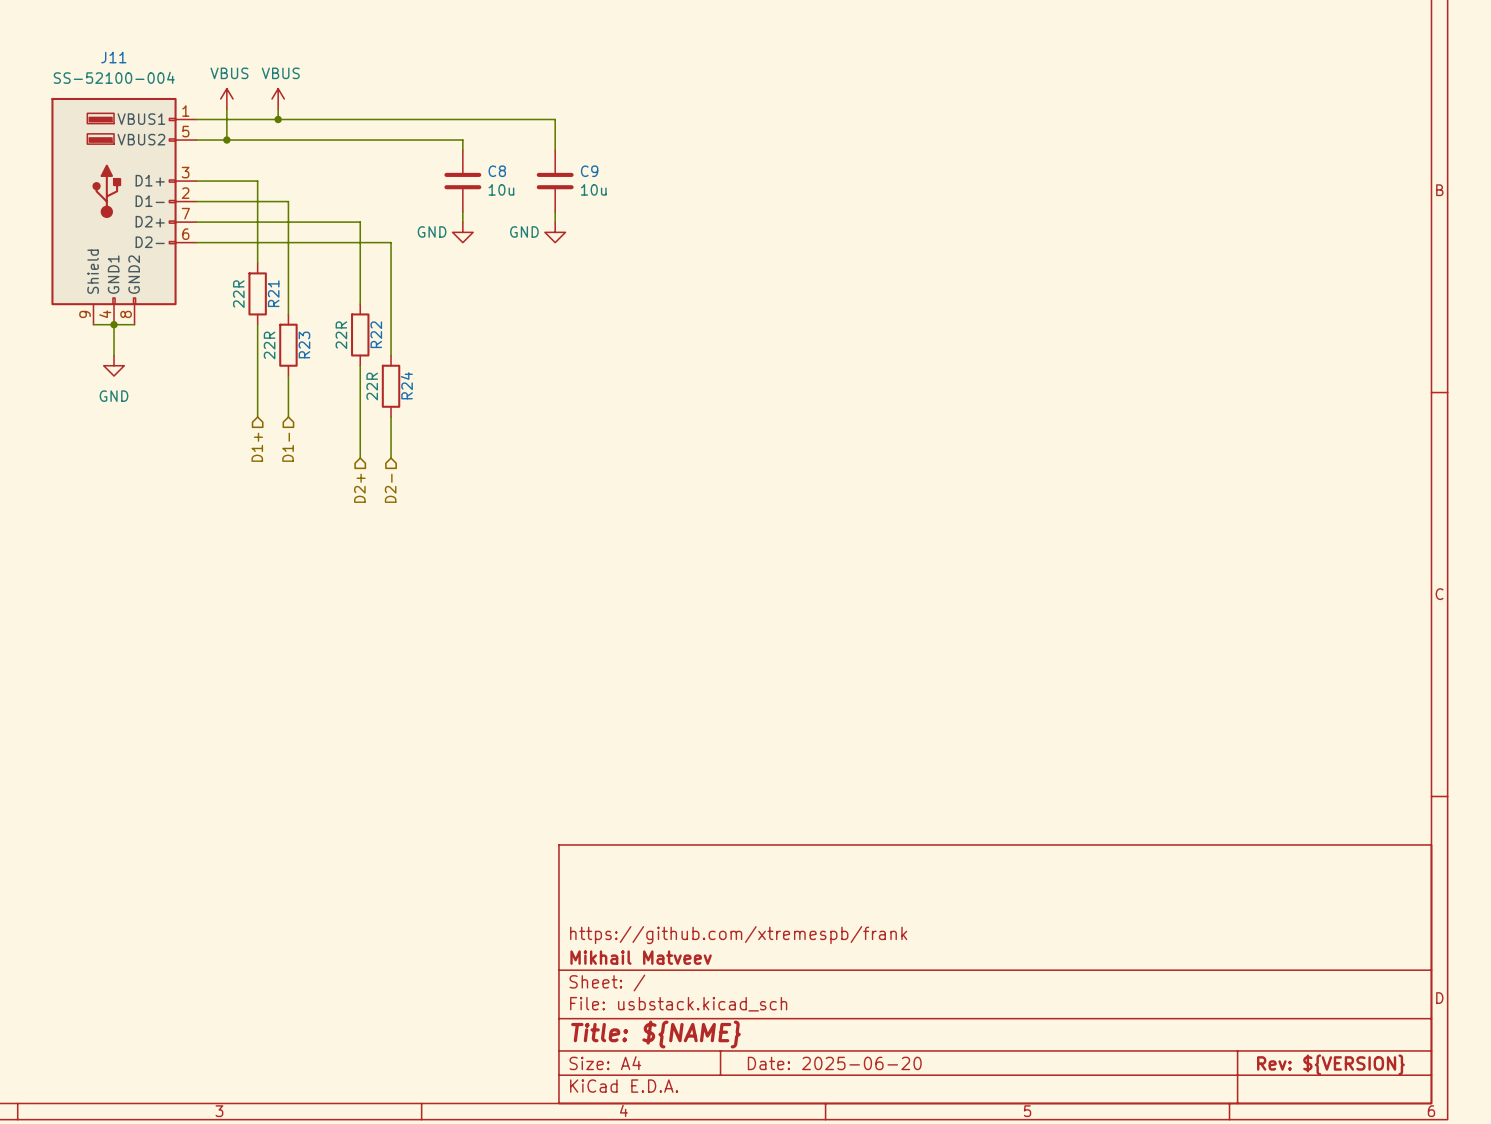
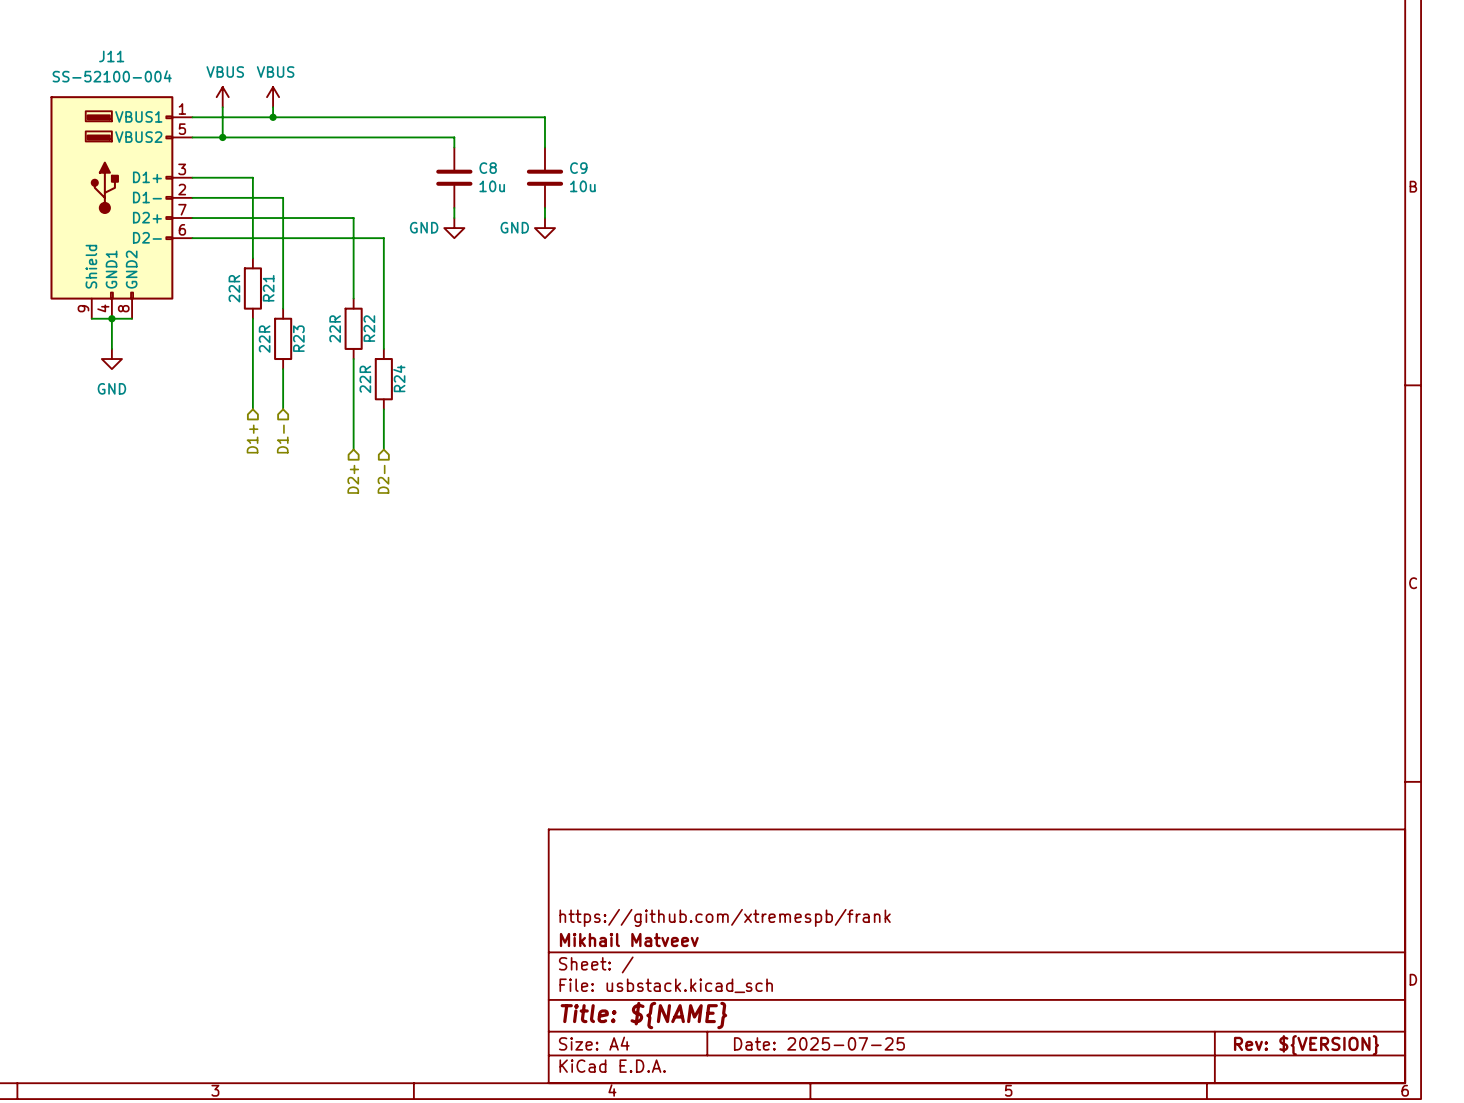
title block: Date: 2025-06-20 (834, 1063) -> Date: 2025-07-25 (819, 1043)

